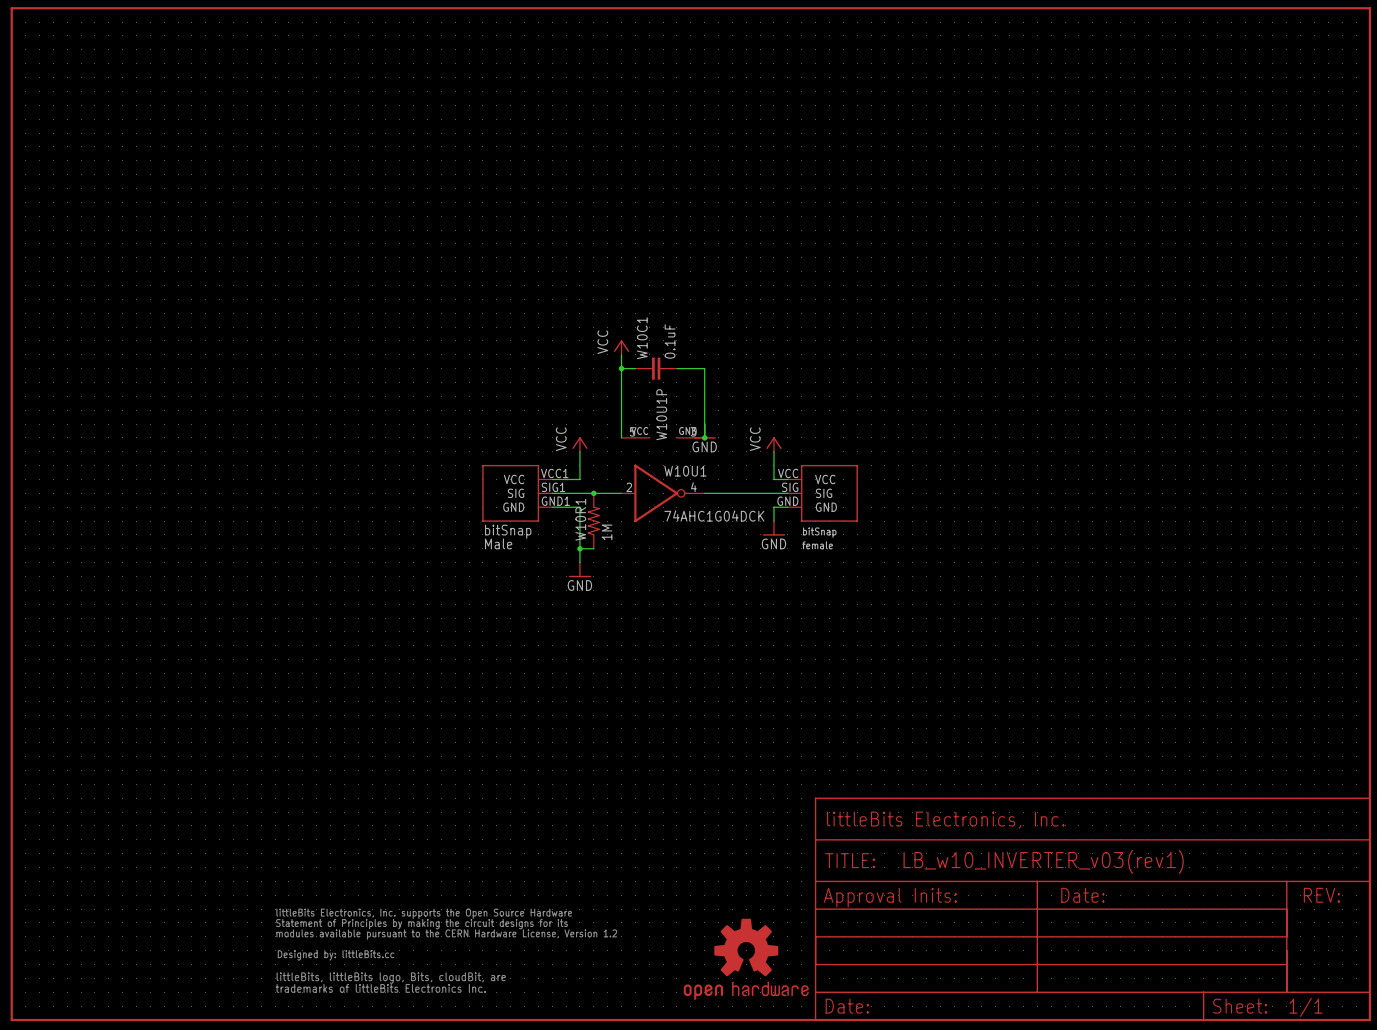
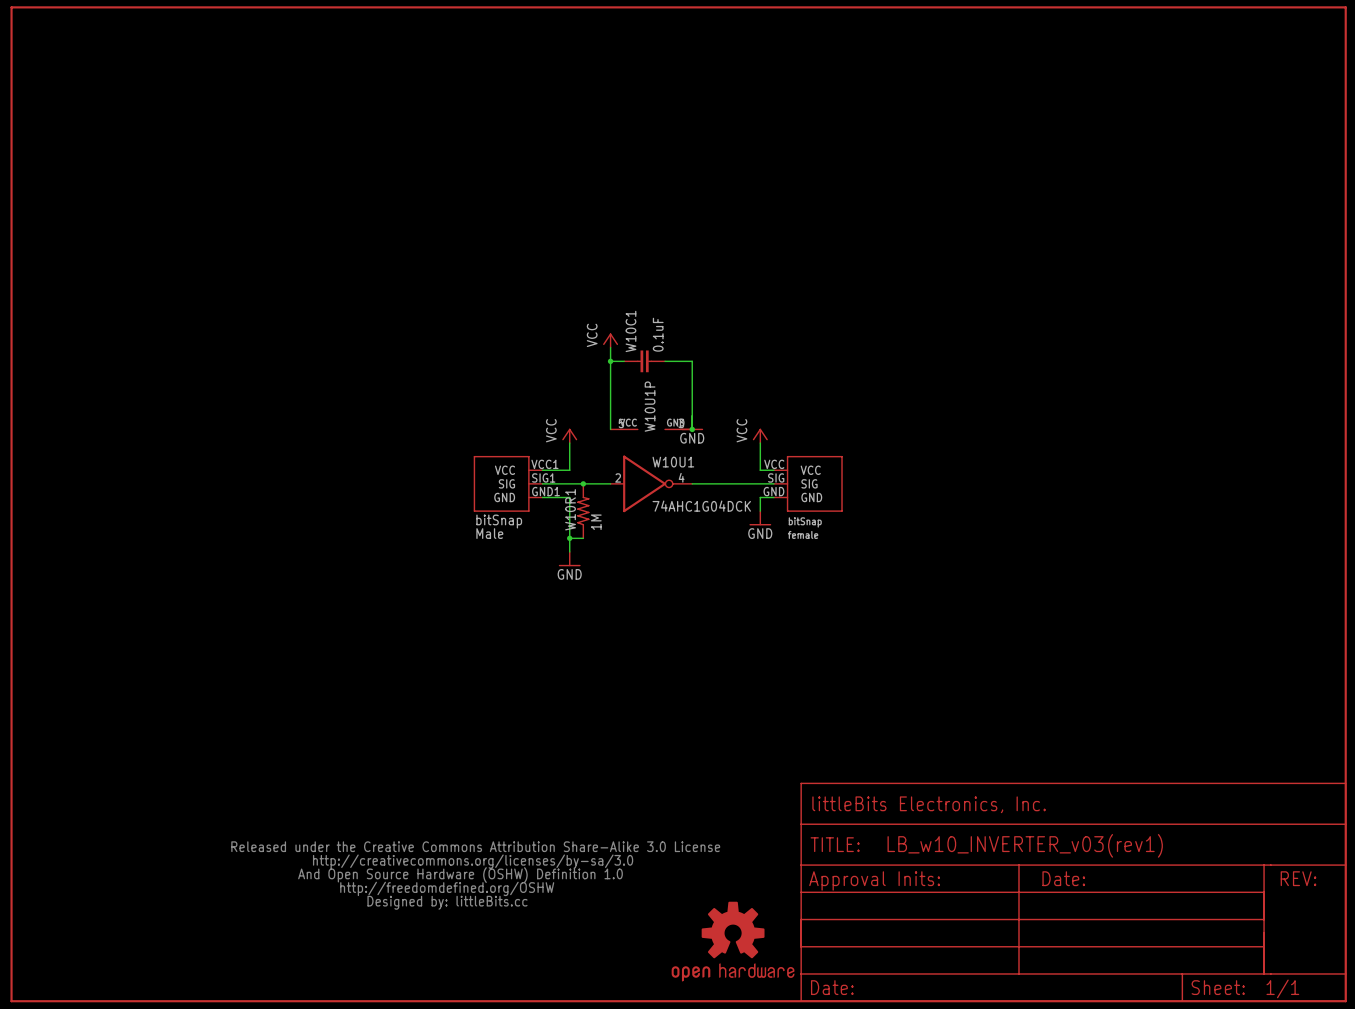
part: none -> (475, 875)
part: (446, 950) -> none

